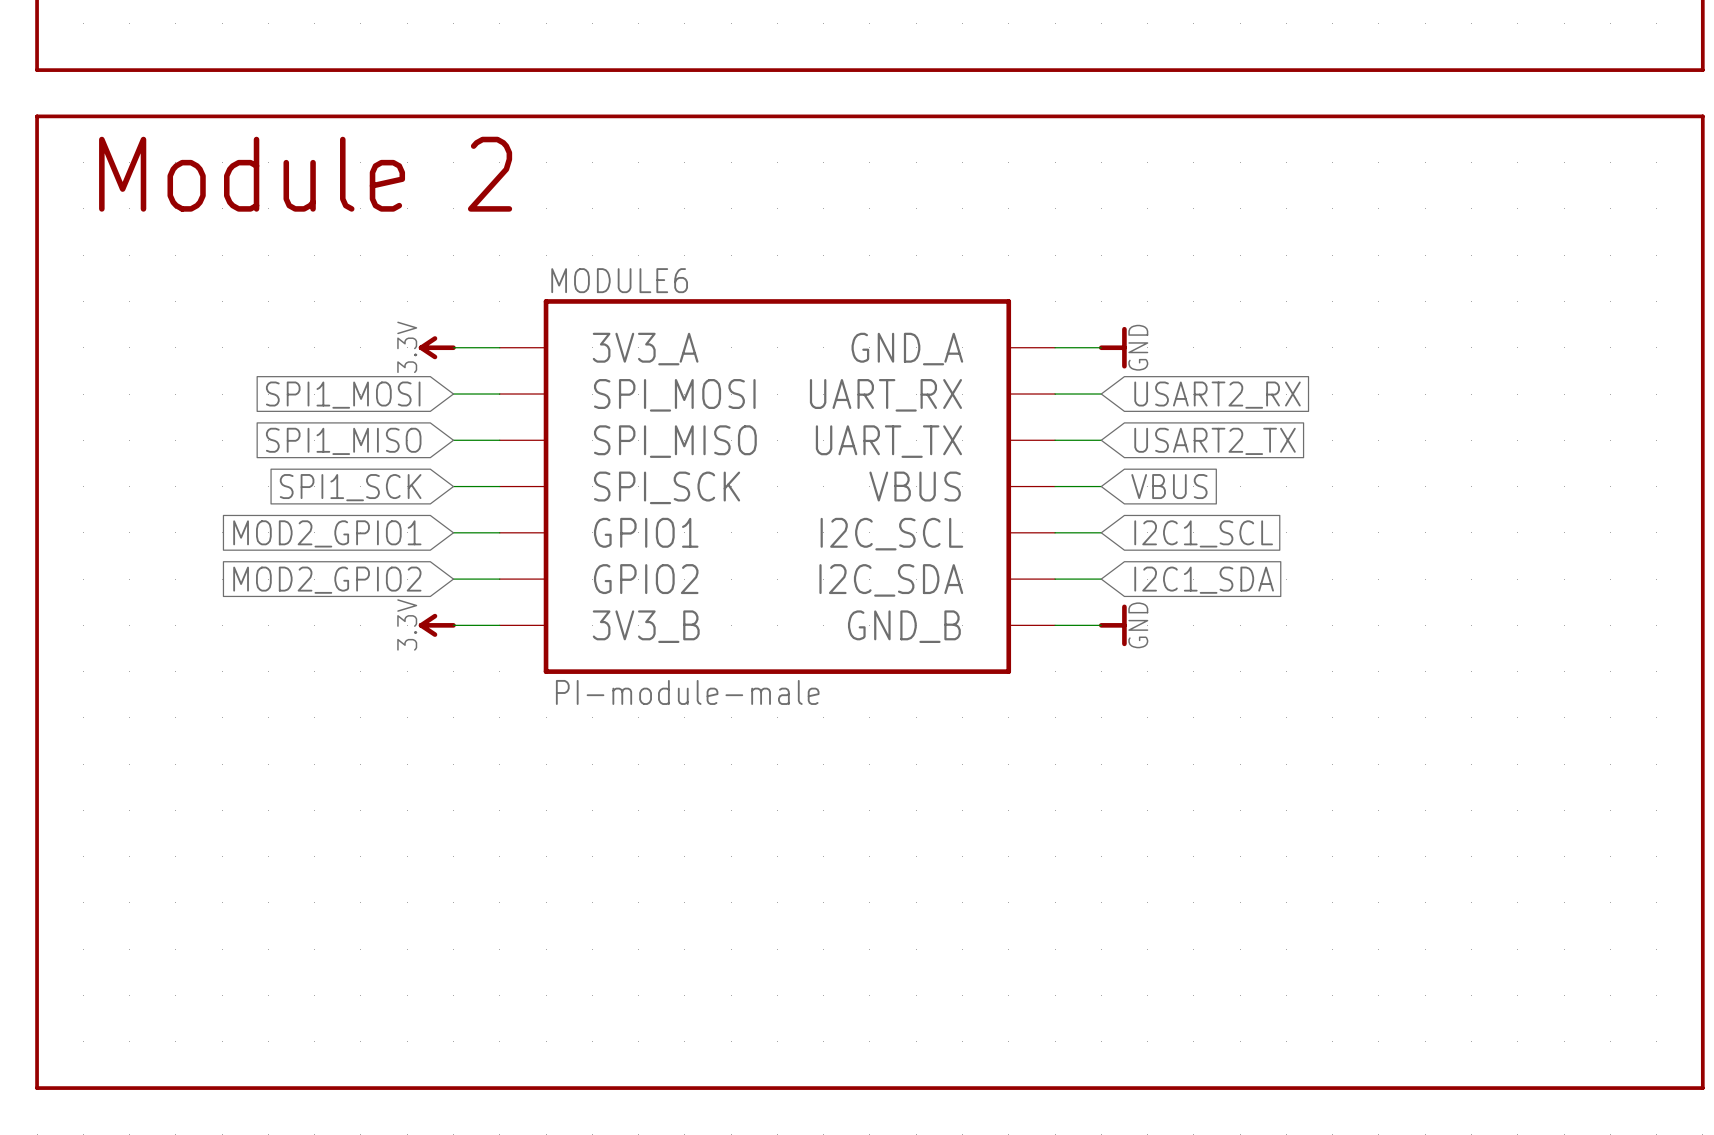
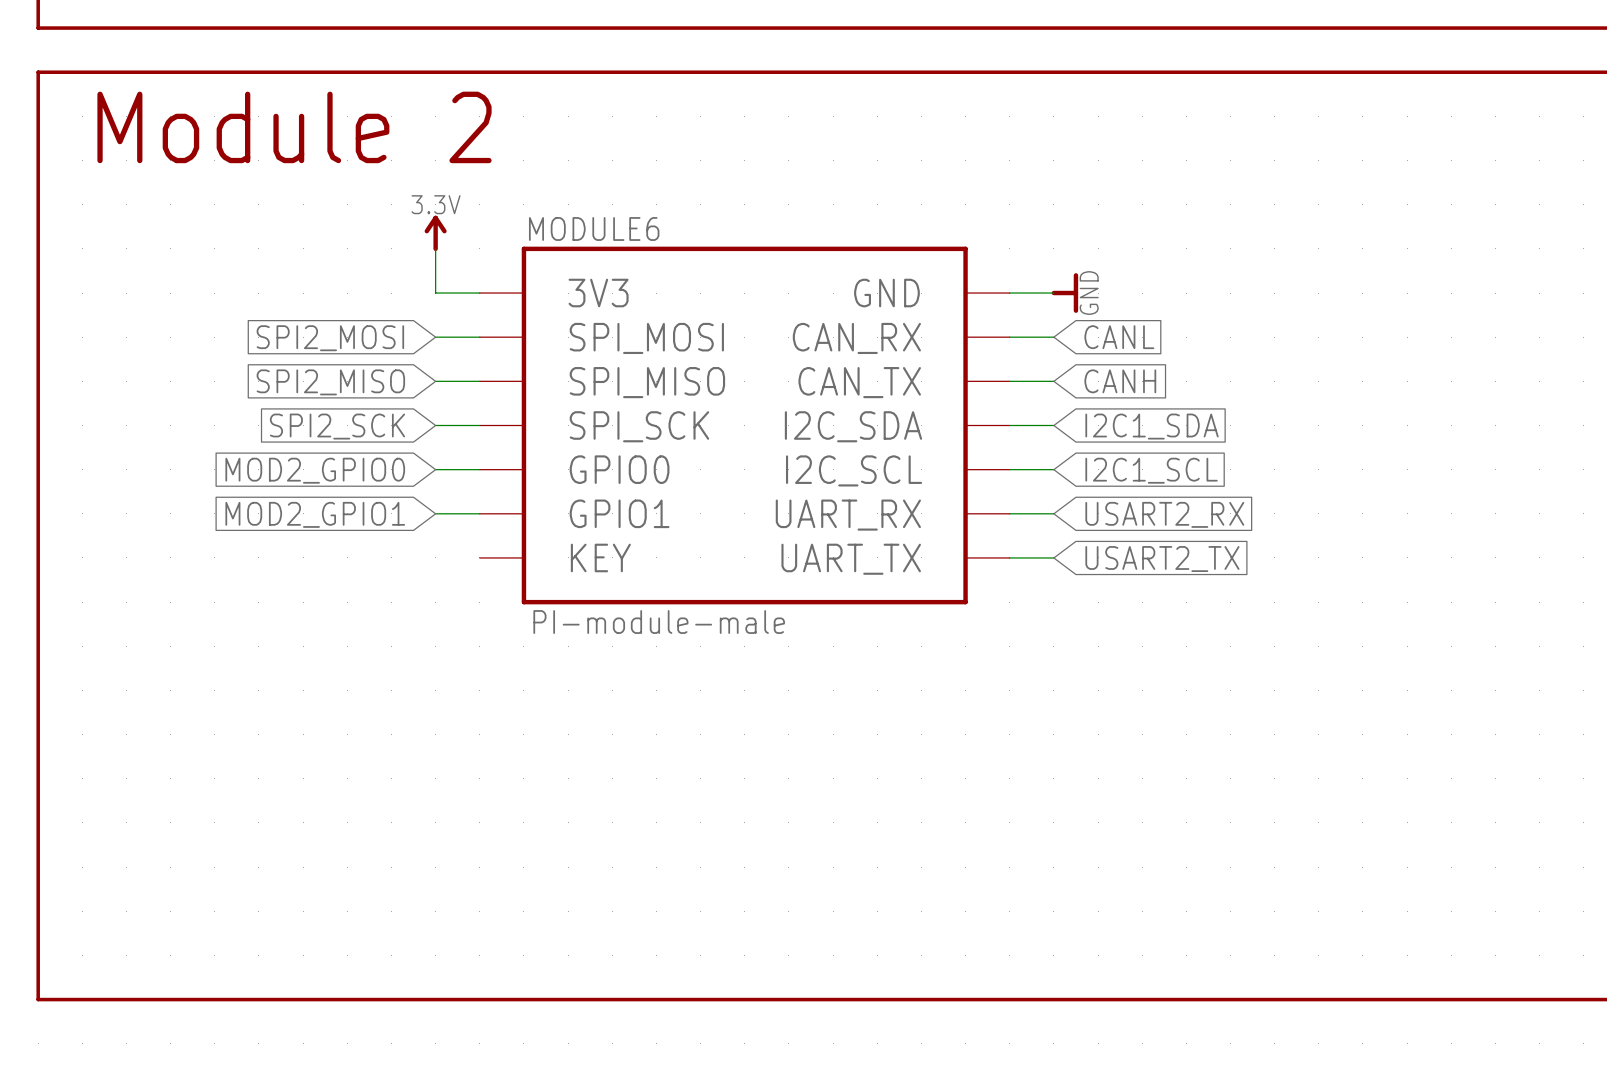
MODULE6 symbol: [499, 299, 1056, 674] -> [479, 246, 1010, 605]
wire: none -> (435, 248) (435, 293)
power symbol rotation: 0° (437, 347) -> 90° clockwise (435, 233)
power symbol position: 3.3V (437, 347) -> 3.3V (435, 233)
global label: SPI1_MOSI (343, 395) -> SPI2_MOSI (330, 338)
global label: USART2_RX (1217, 395) -> CANL (1119, 337)
global label: SPI1_MISO (343, 441) -> SPI2_MISO (330, 382)
global label: USART2_TX (1215, 441) -> CANH (1120, 381)
global label: VBUS (1169, 486) -> I2C1_SDA (1152, 426)
global label: SPI1_SCK (350, 487) -> SPI2_SCK (337, 426)
global label: MOD2_GPIO1 (327, 533) -> MOD2_GPIO0 (315, 470)
global label: MOD2_GPIO2 (327, 580) -> MOD2_GPIO1 (315, 514)
global label: I2C1_SDA (1204, 580) -> USART2_RX (1164, 514)
power symbol: 3.3V (437, 625) -> none
wire: (453, 625) (499, 625) -> none
power symbol: GND (1112, 625) -> none
global label: none -> USART2_TX (1162, 559)

